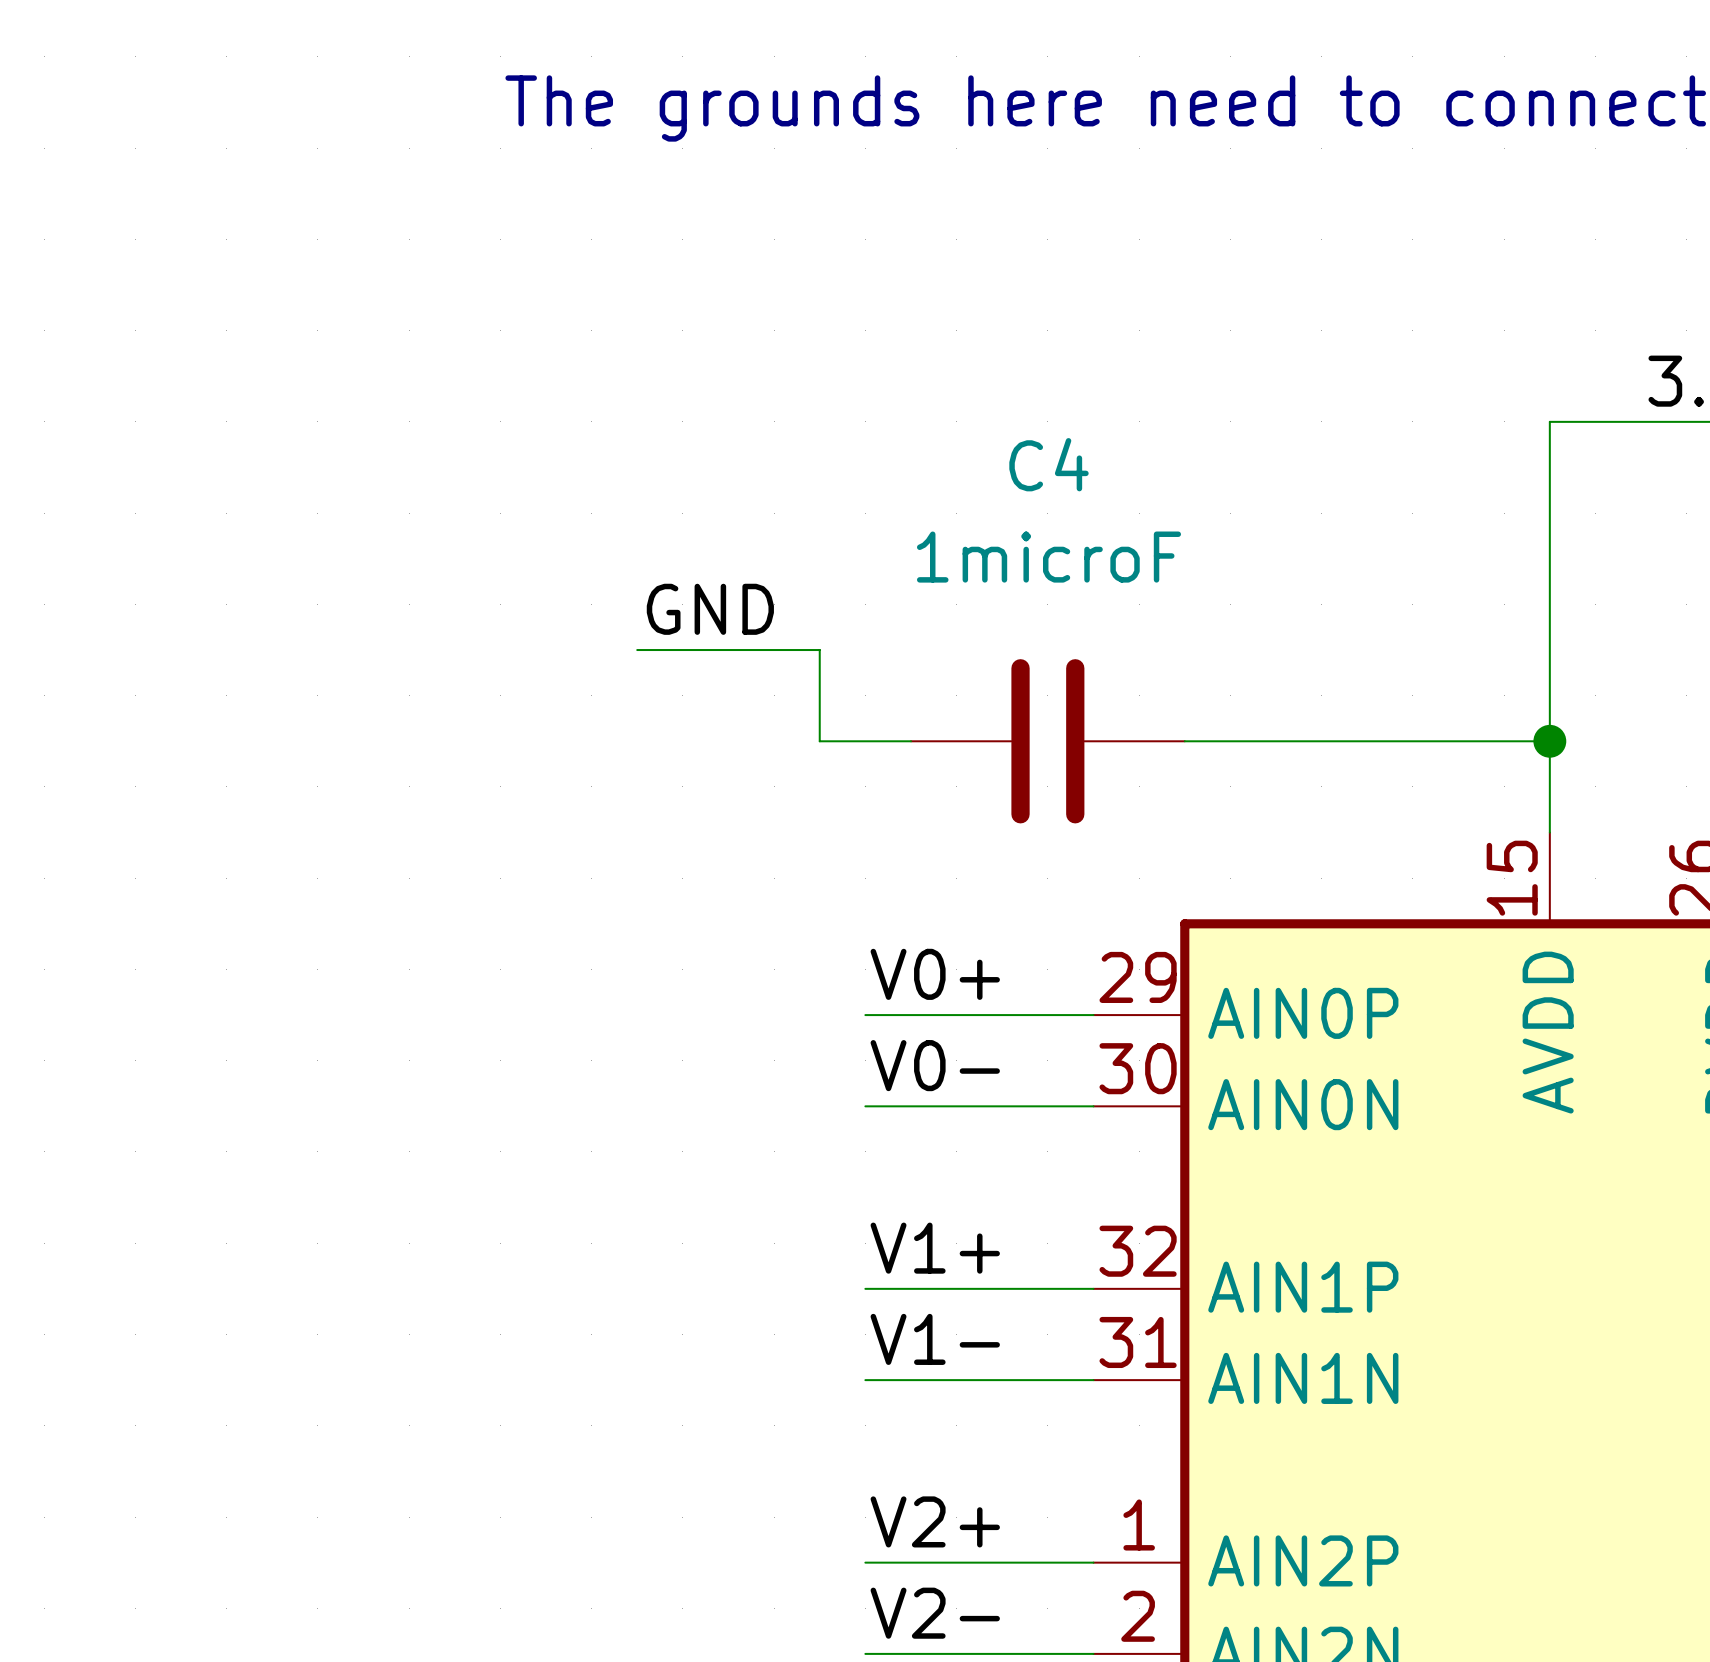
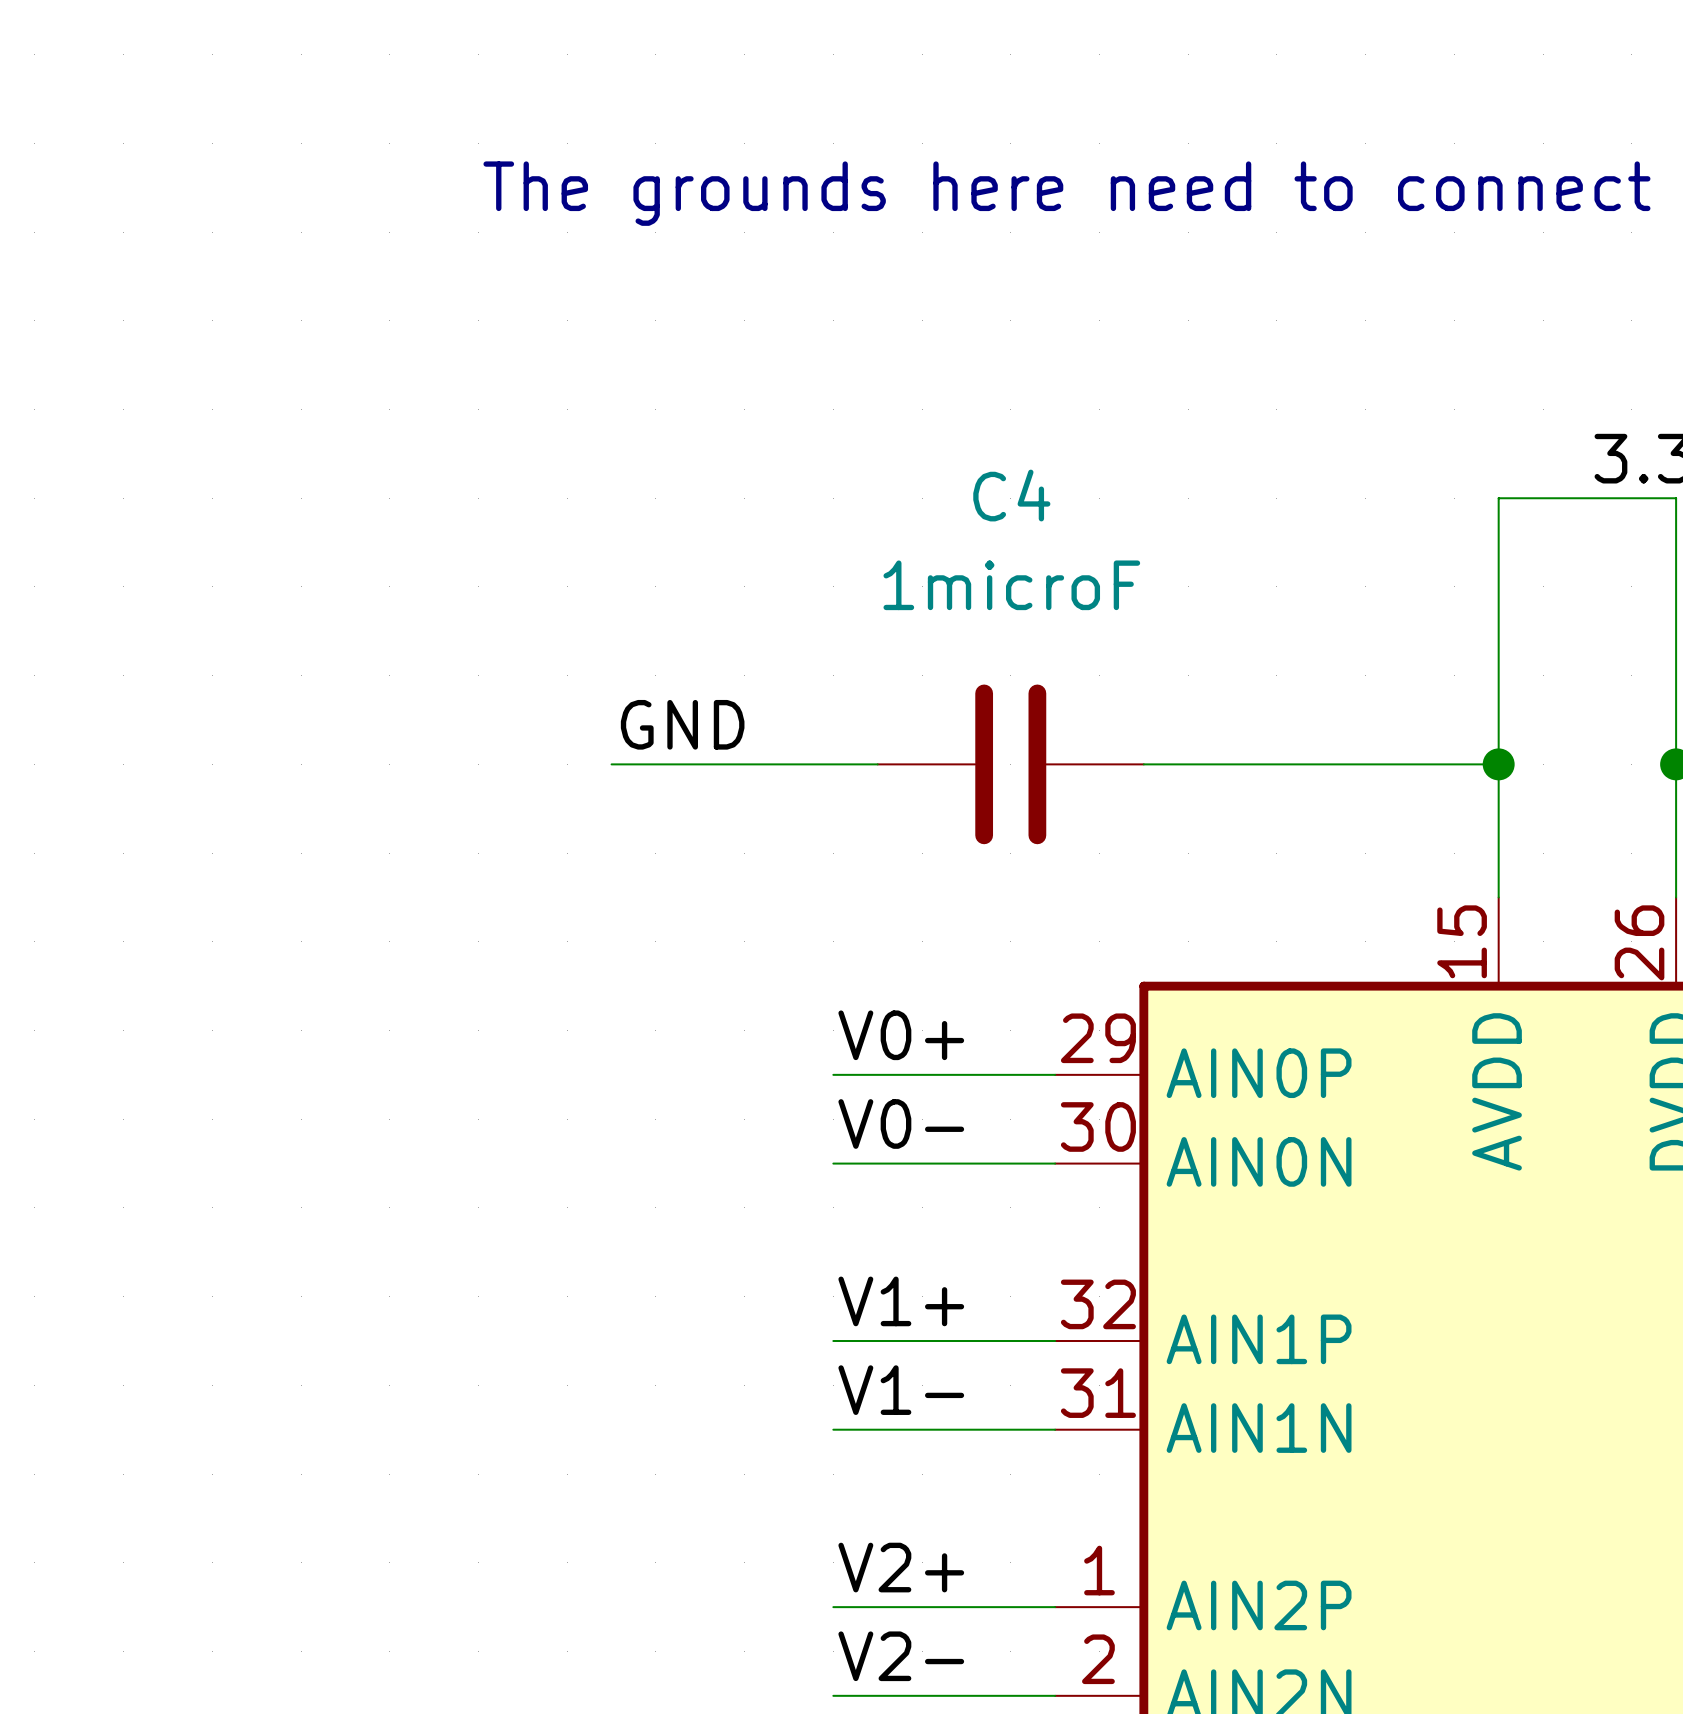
label position: GND (710, 609) -> GND (682, 724)
wire: (637, 650) (819, 650) (819, 741) (911, 741) -> none
wire: none -> (611, 764) (877, 764)
C4 position: (1047, 741) -> (1010, 764)
wire: (1184, 741) (1549, 741) -> (1143, 764) (1498, 764)
junction position: (1549, 741) -> (1498, 764)

